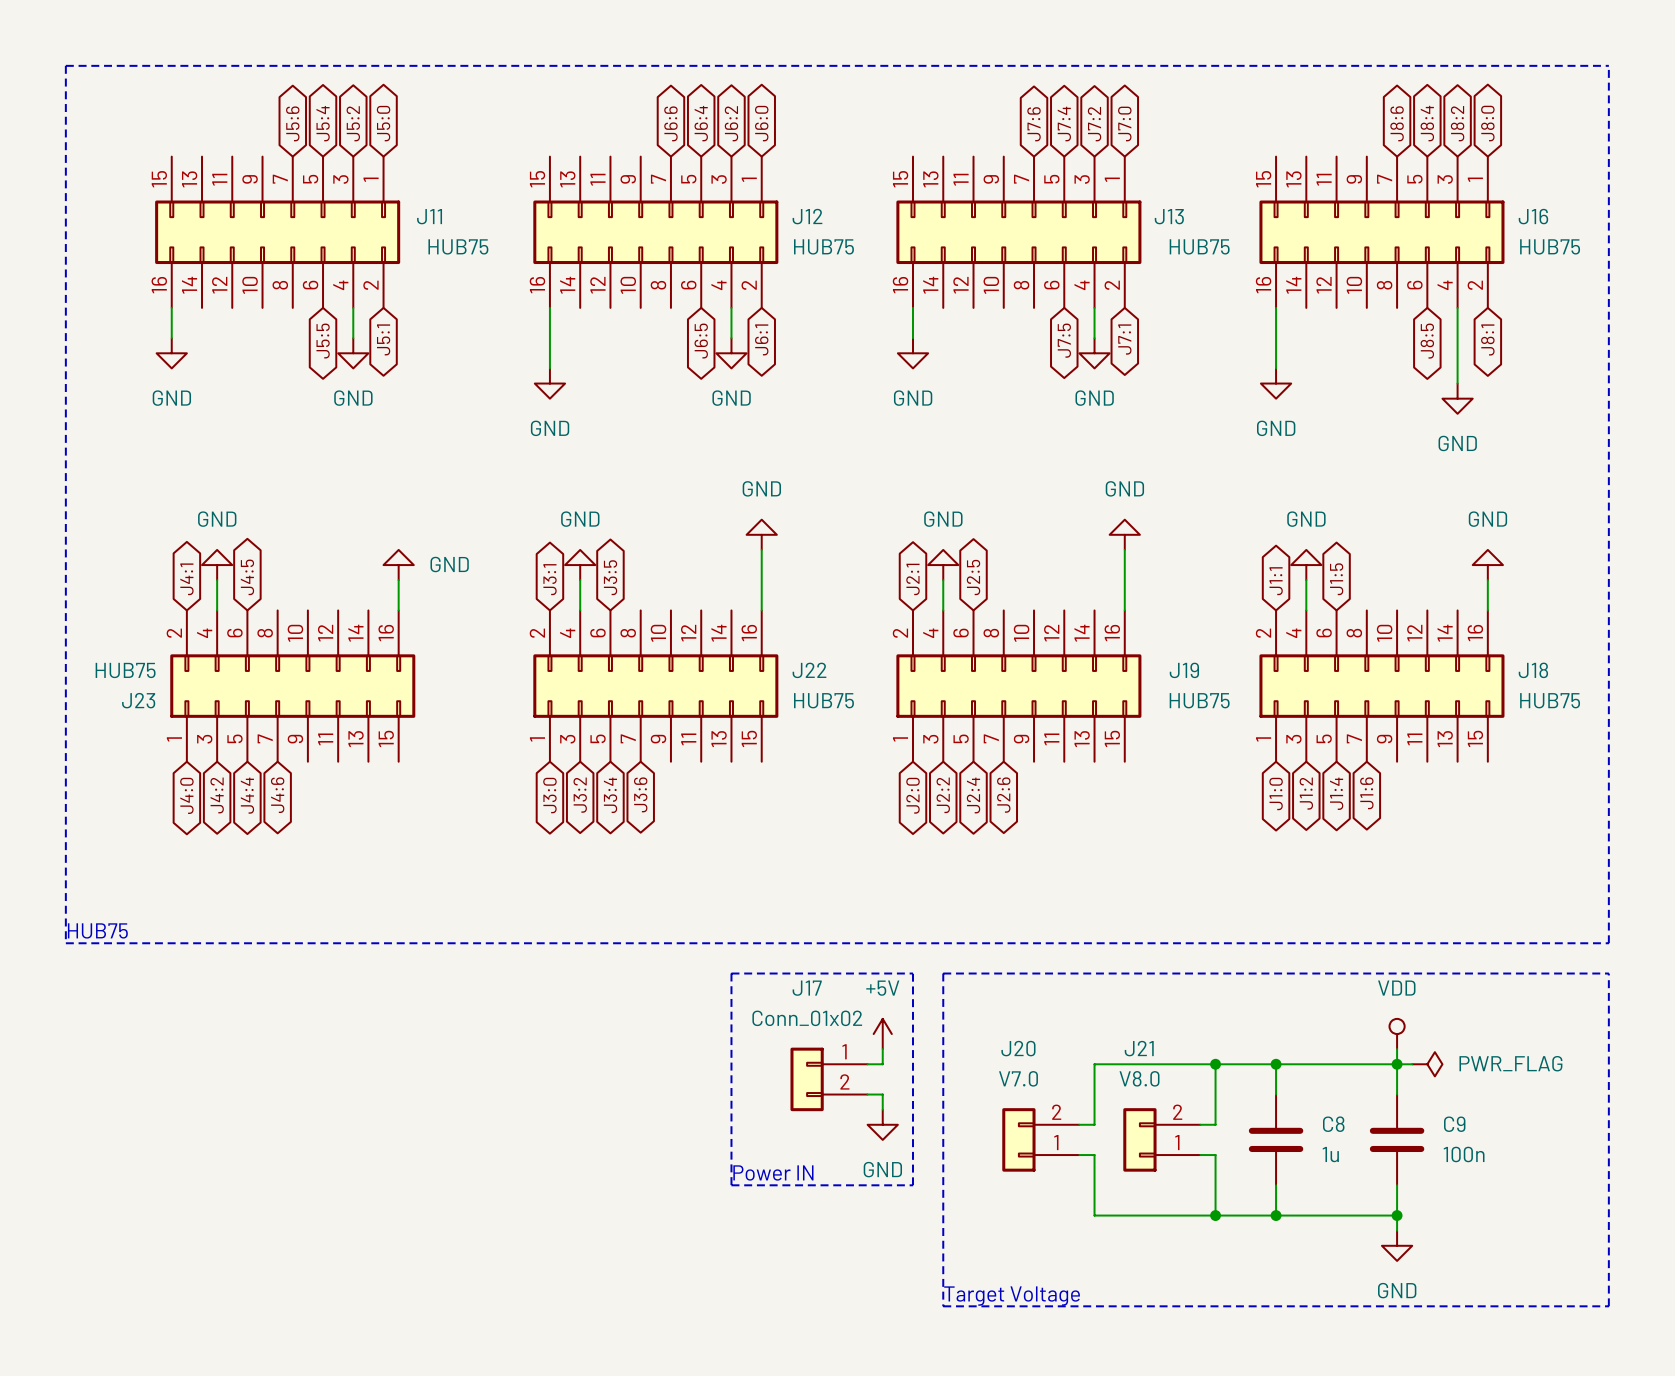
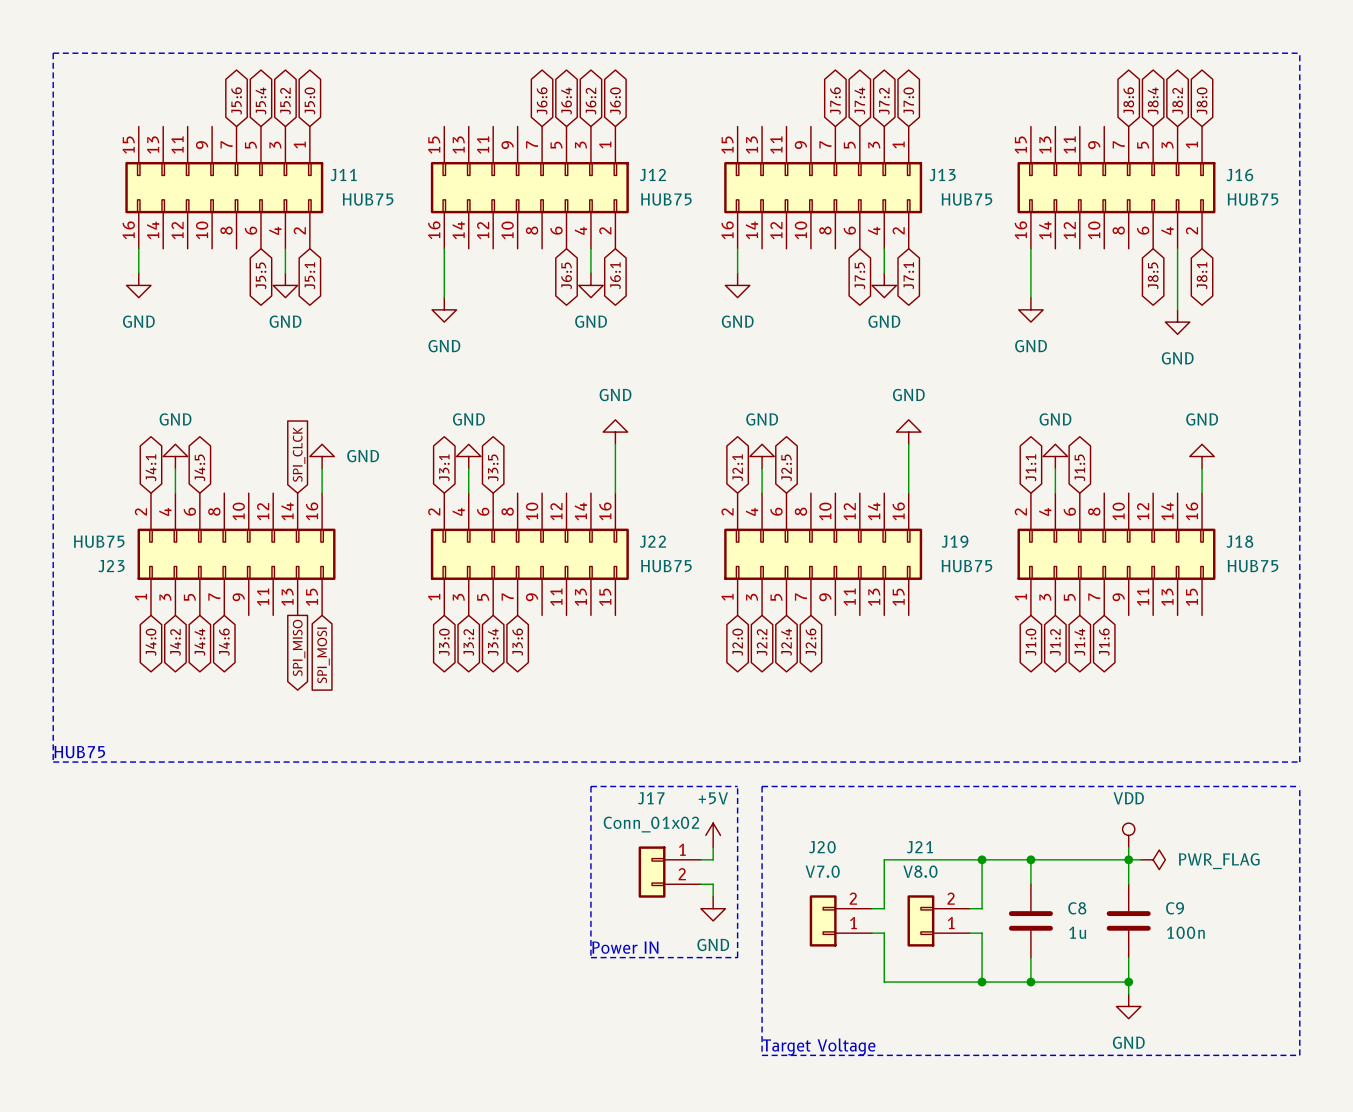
global label: none -> SPI_CLCK (299, 454)
global label: none -> SPI_MISO (299, 647)
global label: none -> SPI_MOSI (323, 655)

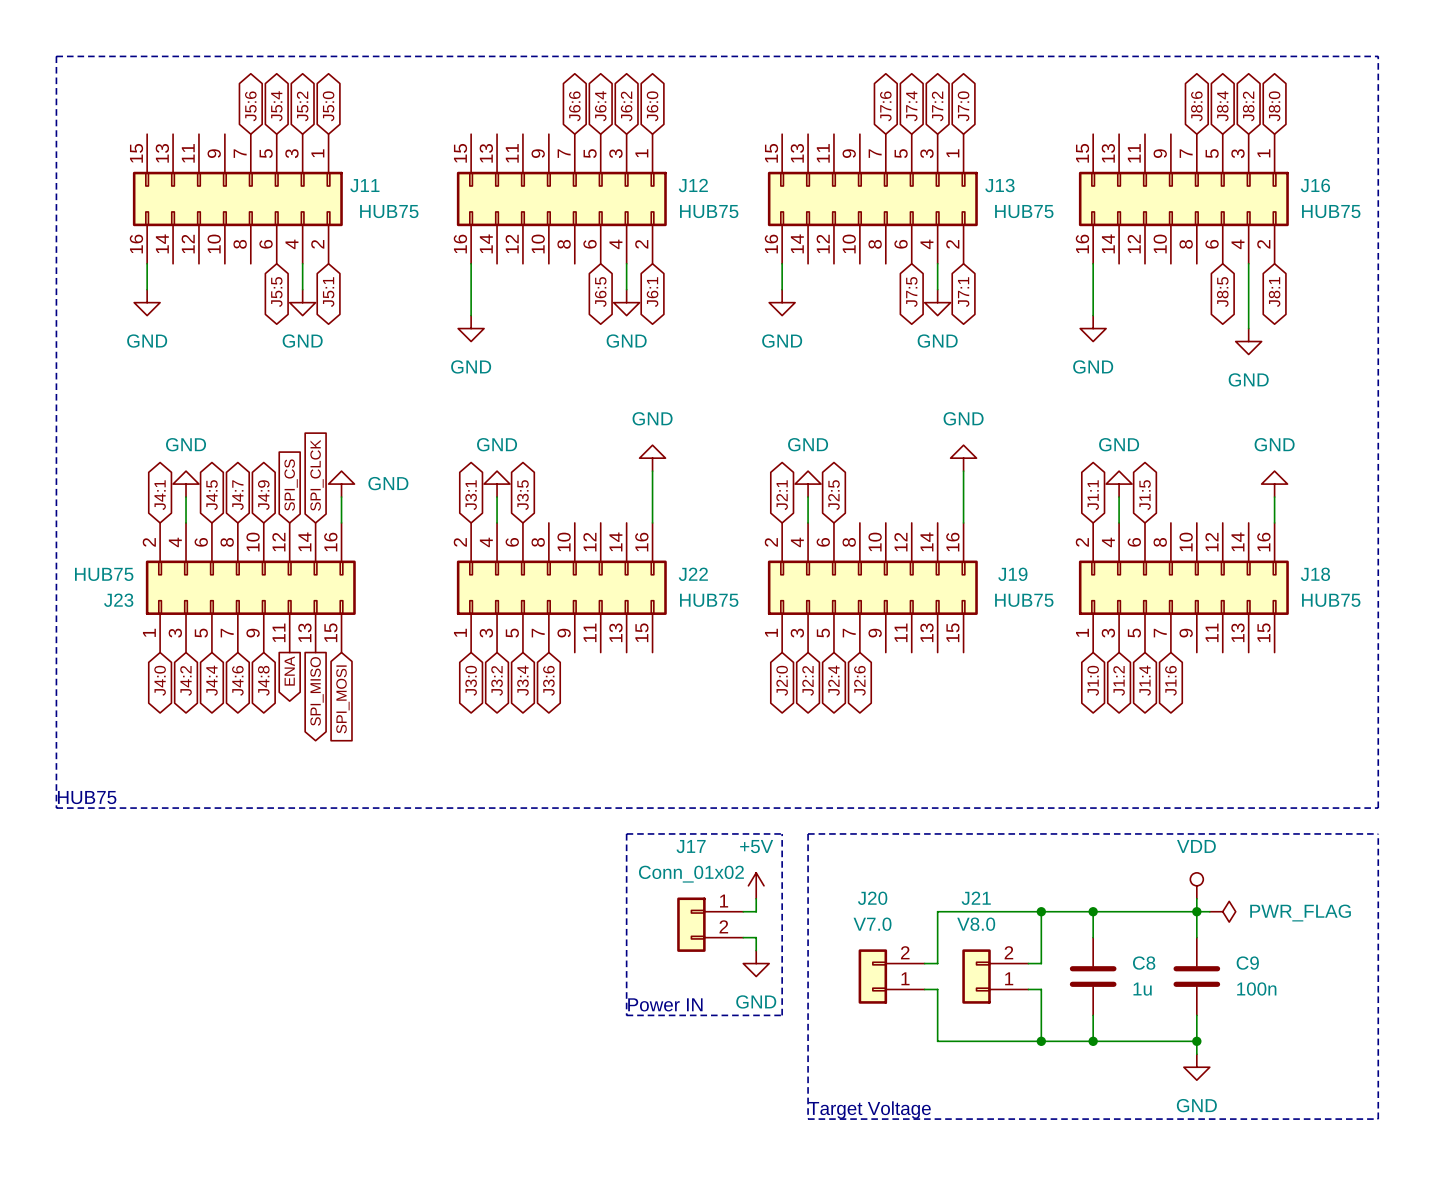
global label: none -> SPI_CS (291, 485)
global label: none -> J4:7 (237, 495)
global label: none -> J4:9 (263, 495)
global label: none -> ENA (289, 671)
global label: none -> J4:8 (263, 680)

